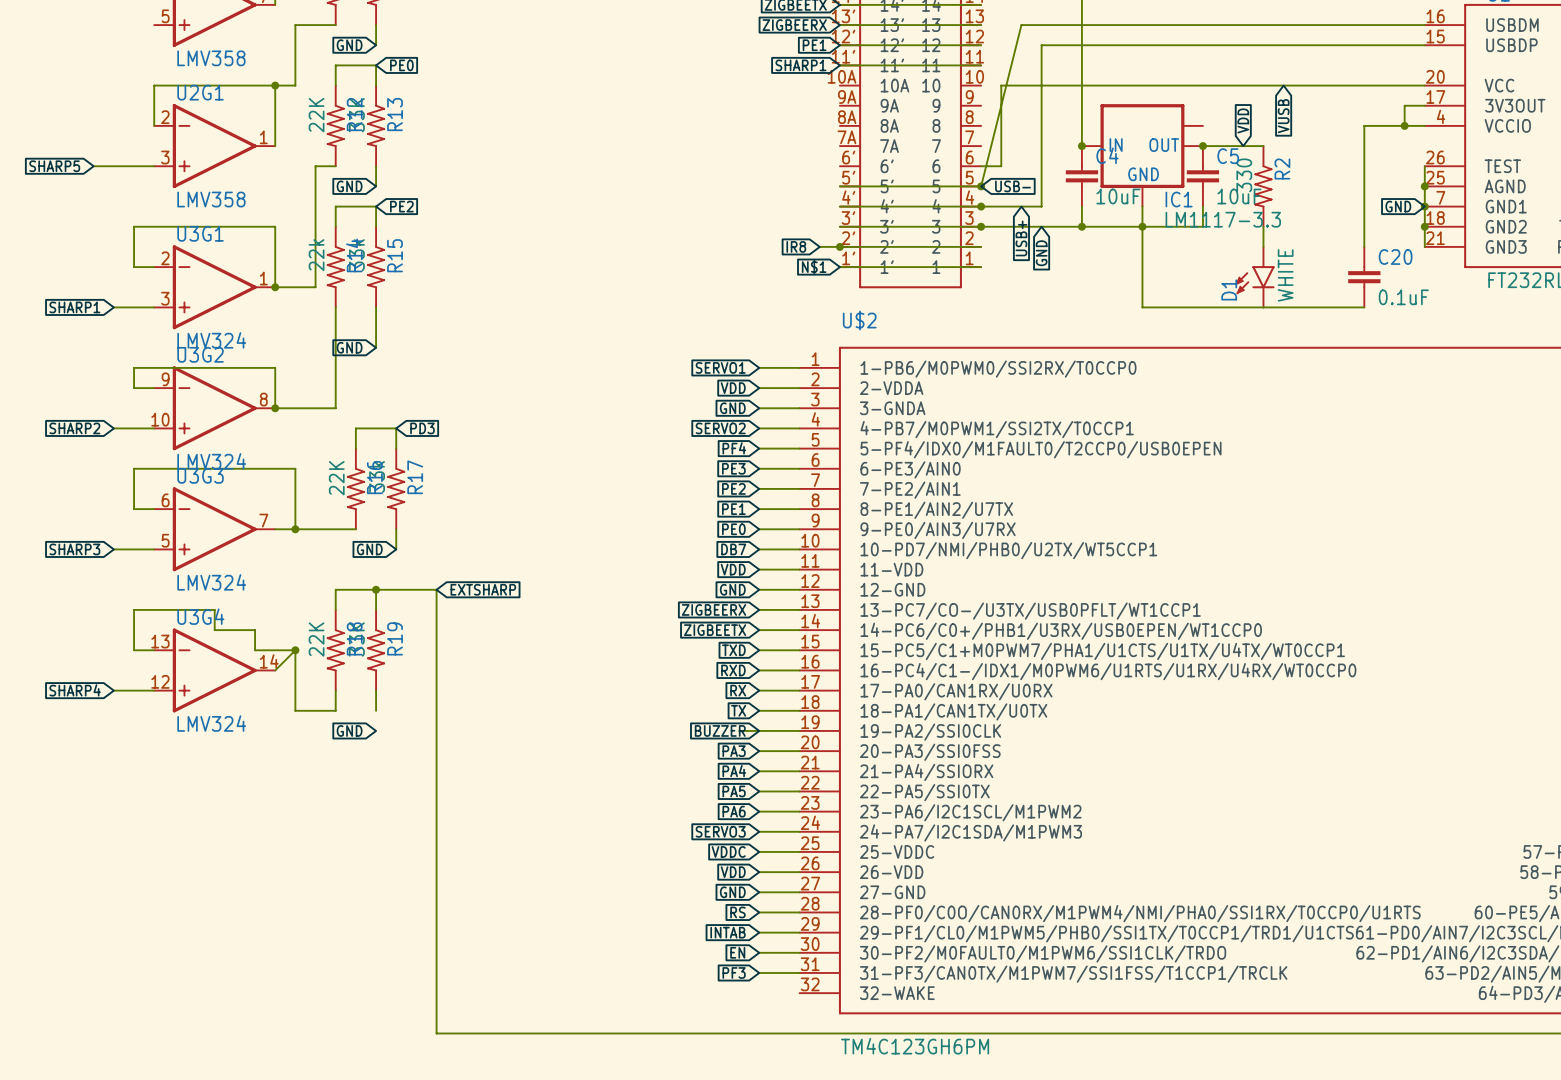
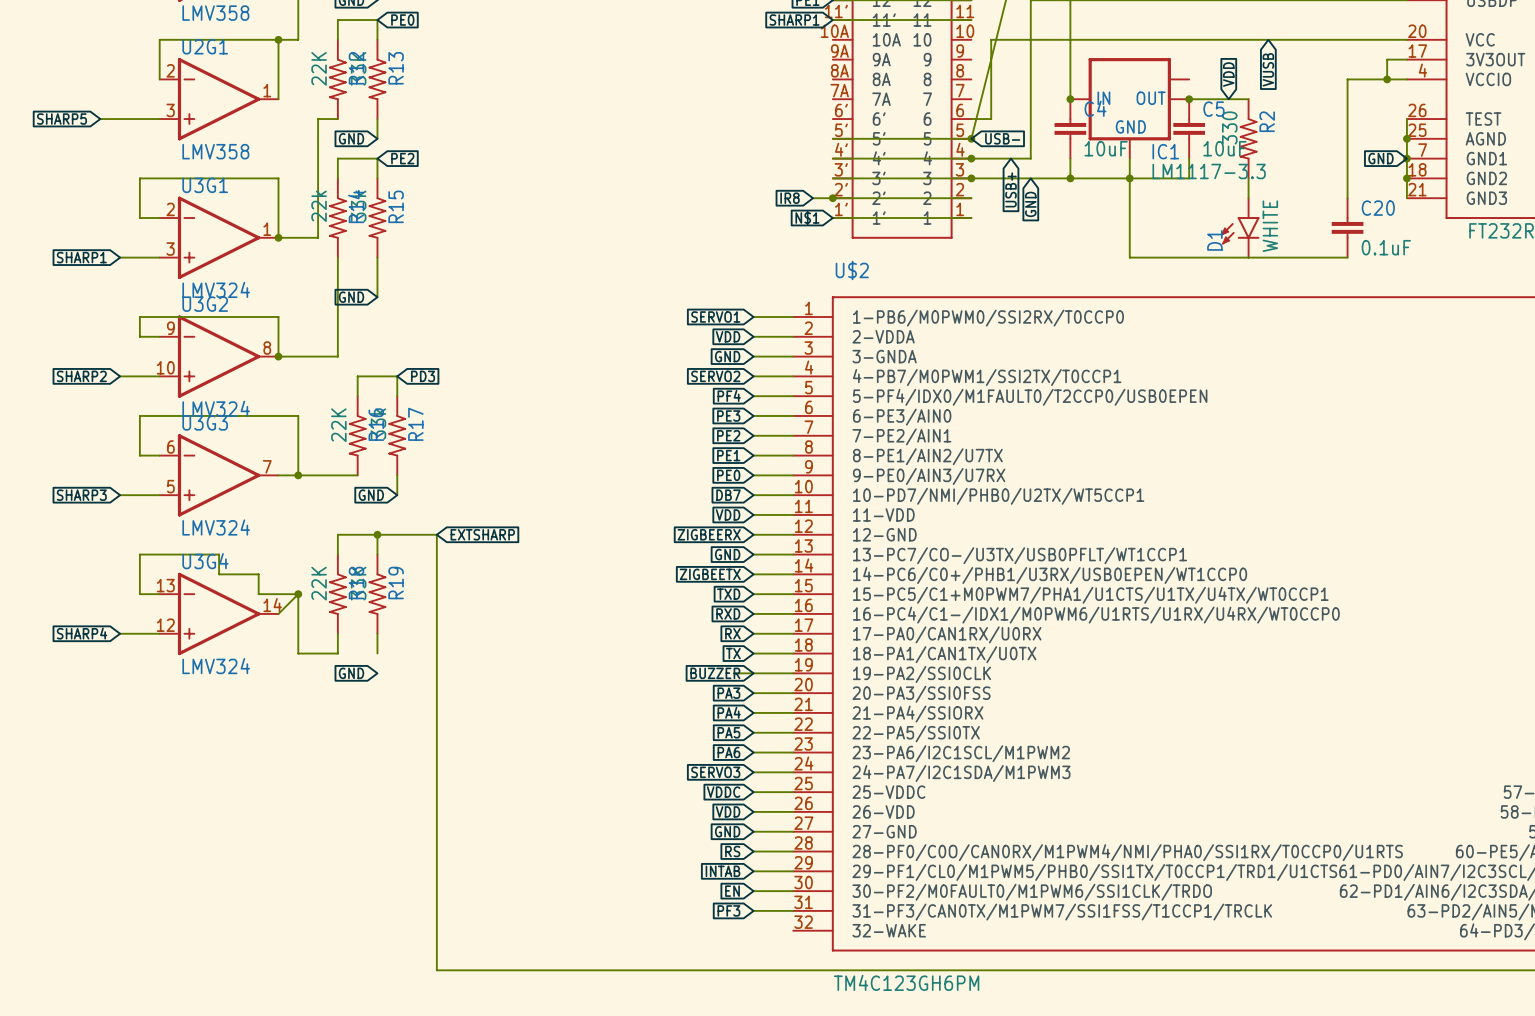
global label: GND (732, 589) -> ZIGBEERX (709, 534)
global label: ZIGBEERX (714, 609) -> GND (727, 554)

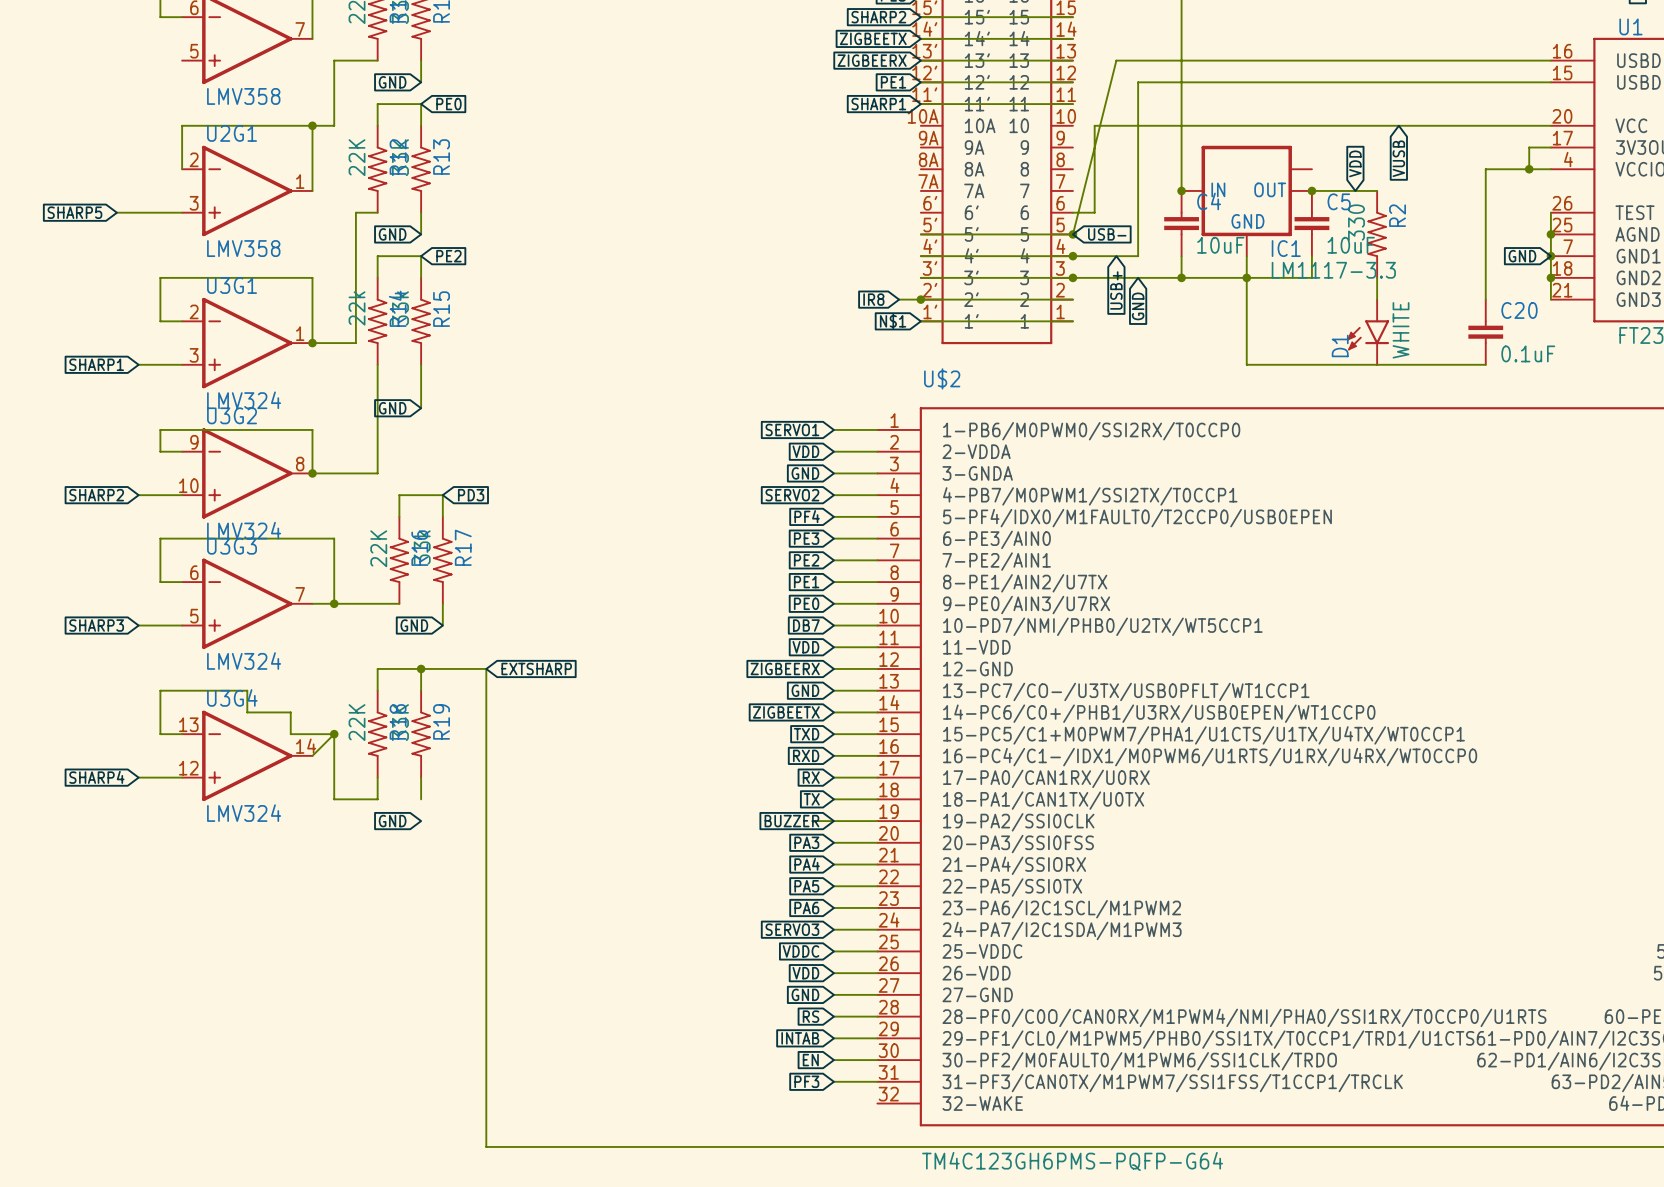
U$2 value: TM4C123GH6PM (906, 982) -> TM4C123GH6PMS-PQFP-G64 (1072, 1161)

